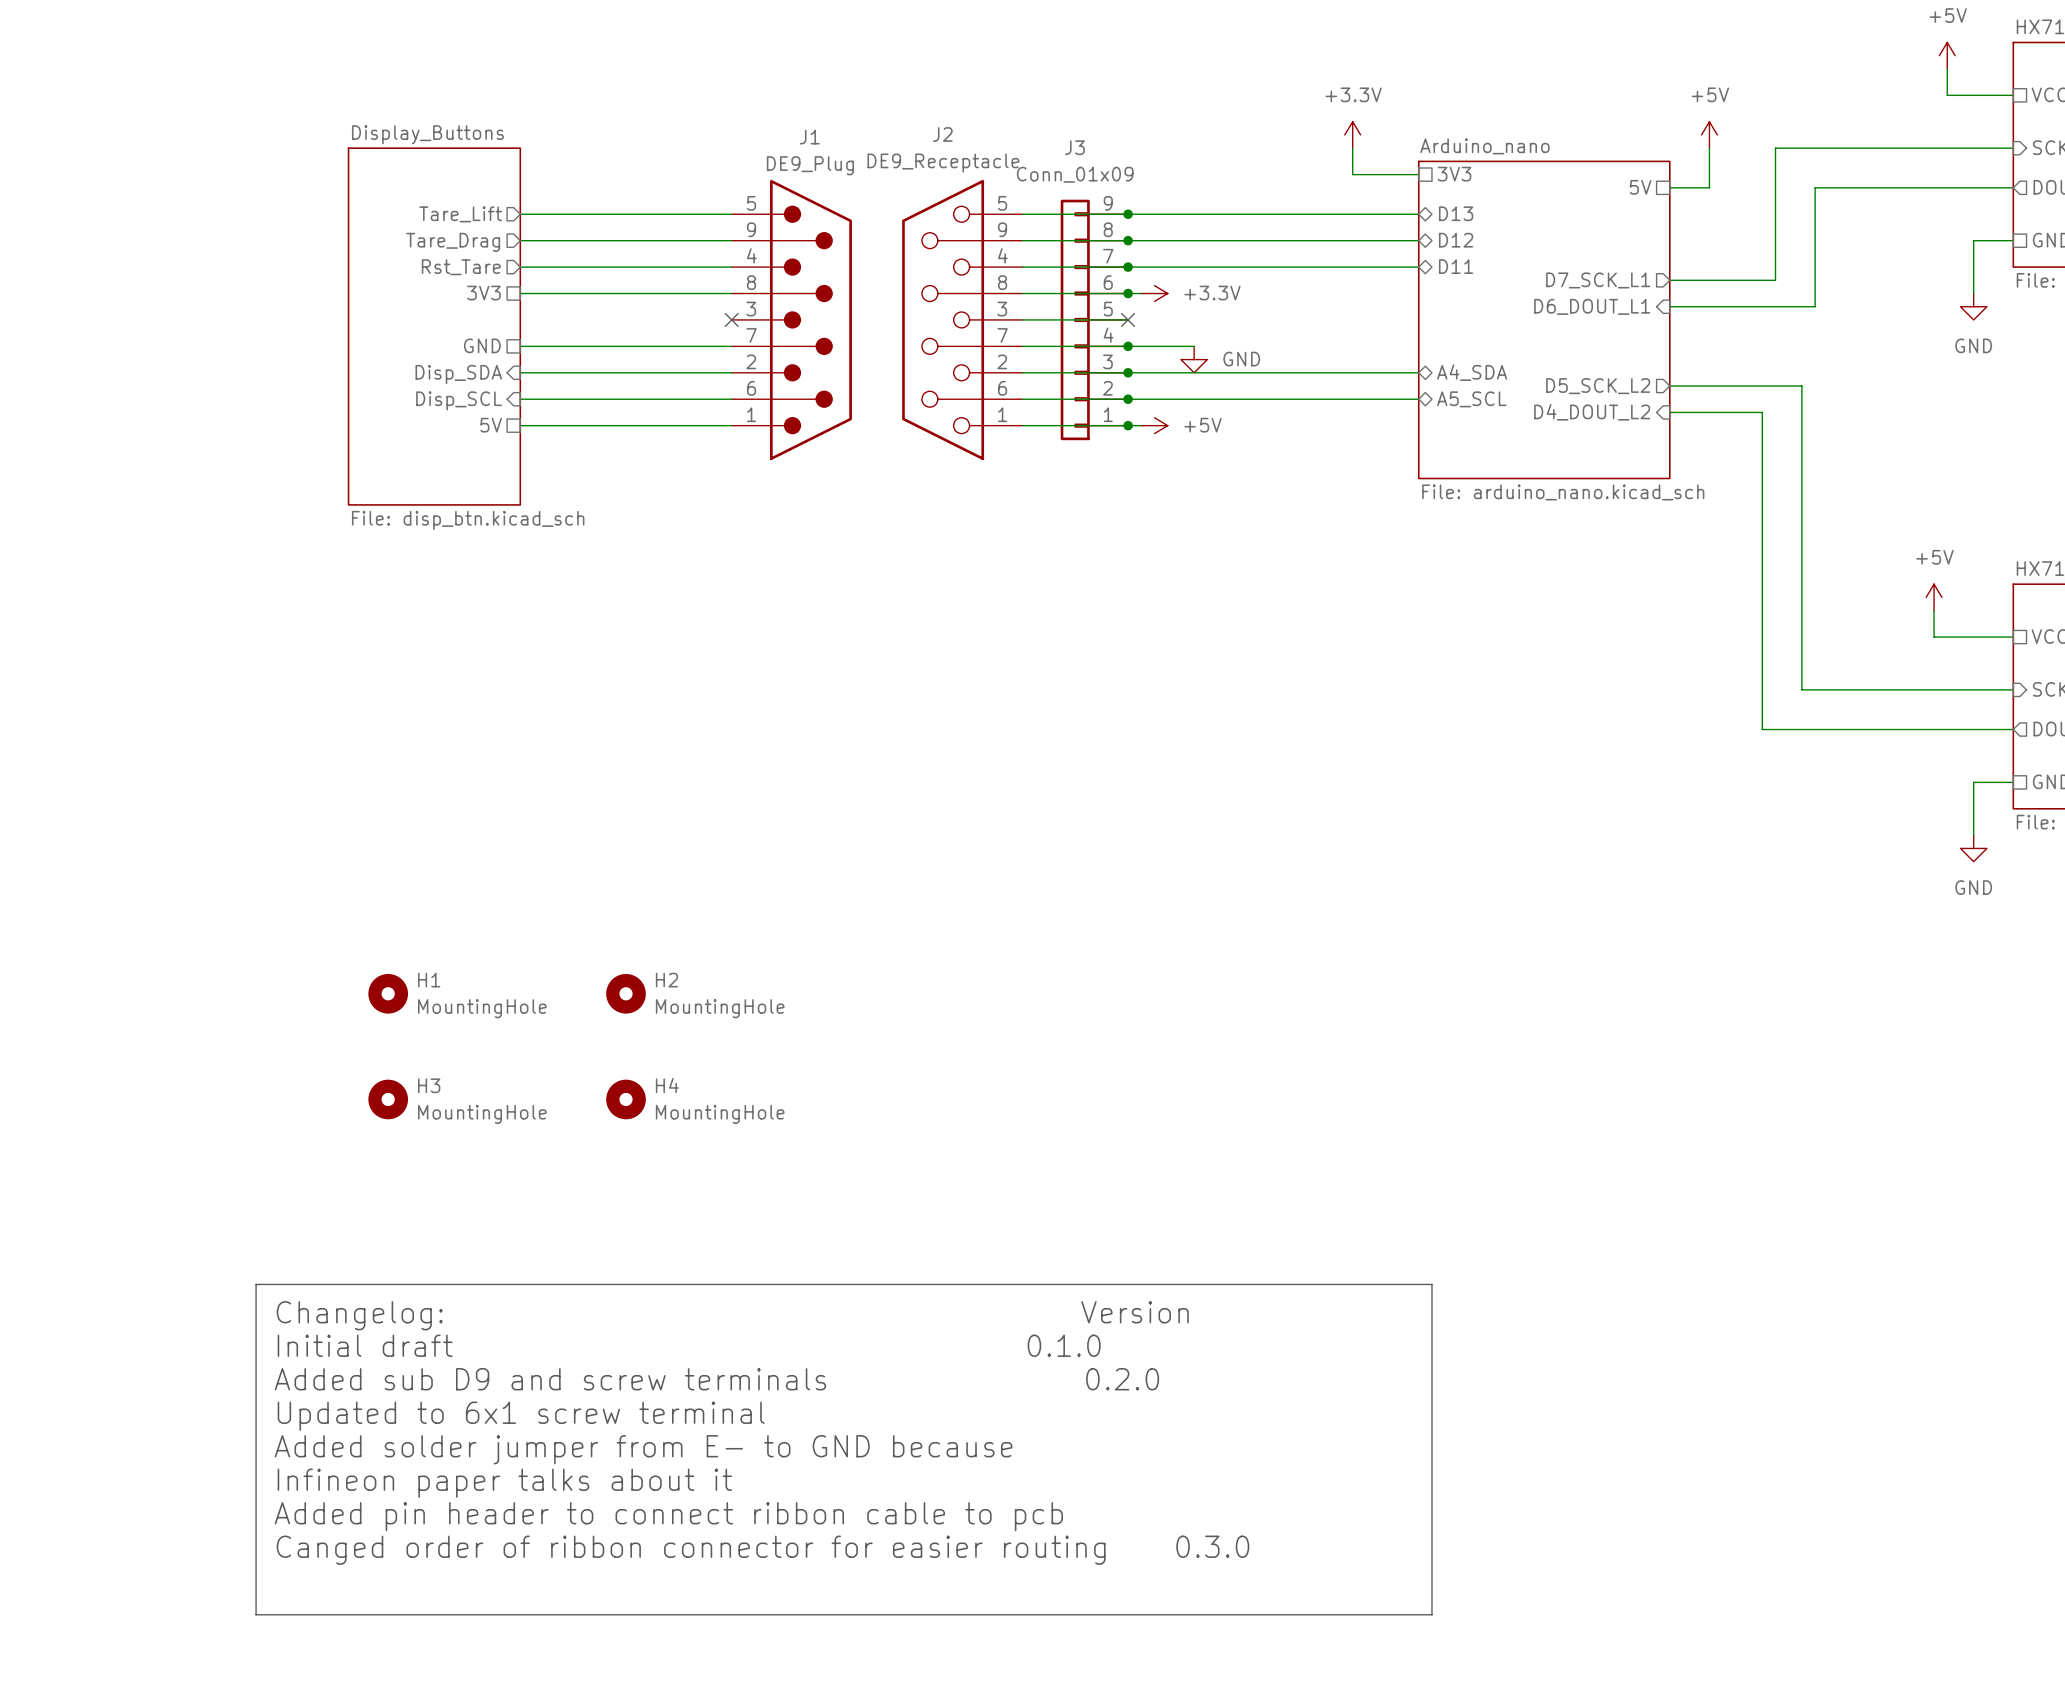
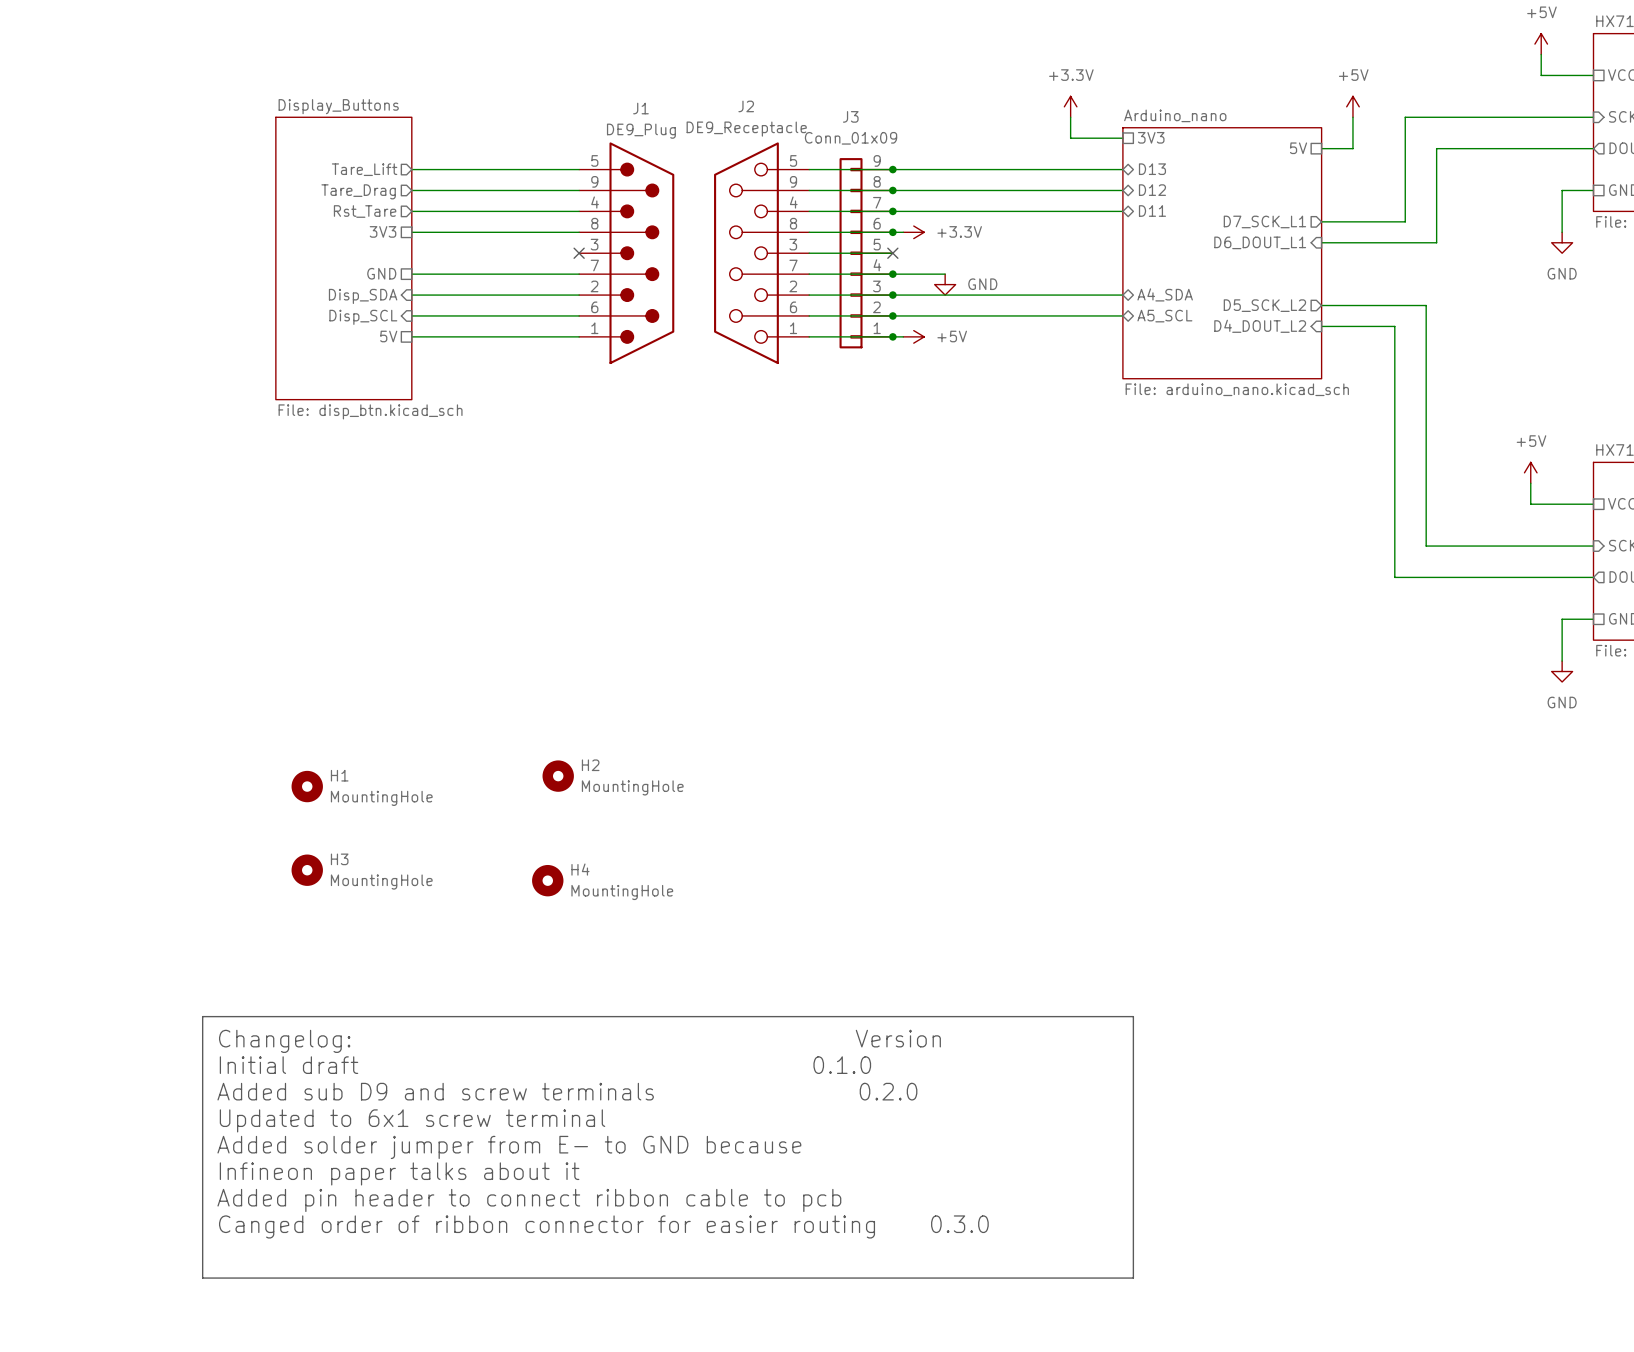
H2 position: (626, 993) -> (558, 776)
H4 position: (626, 1099) -> (547, 880)

